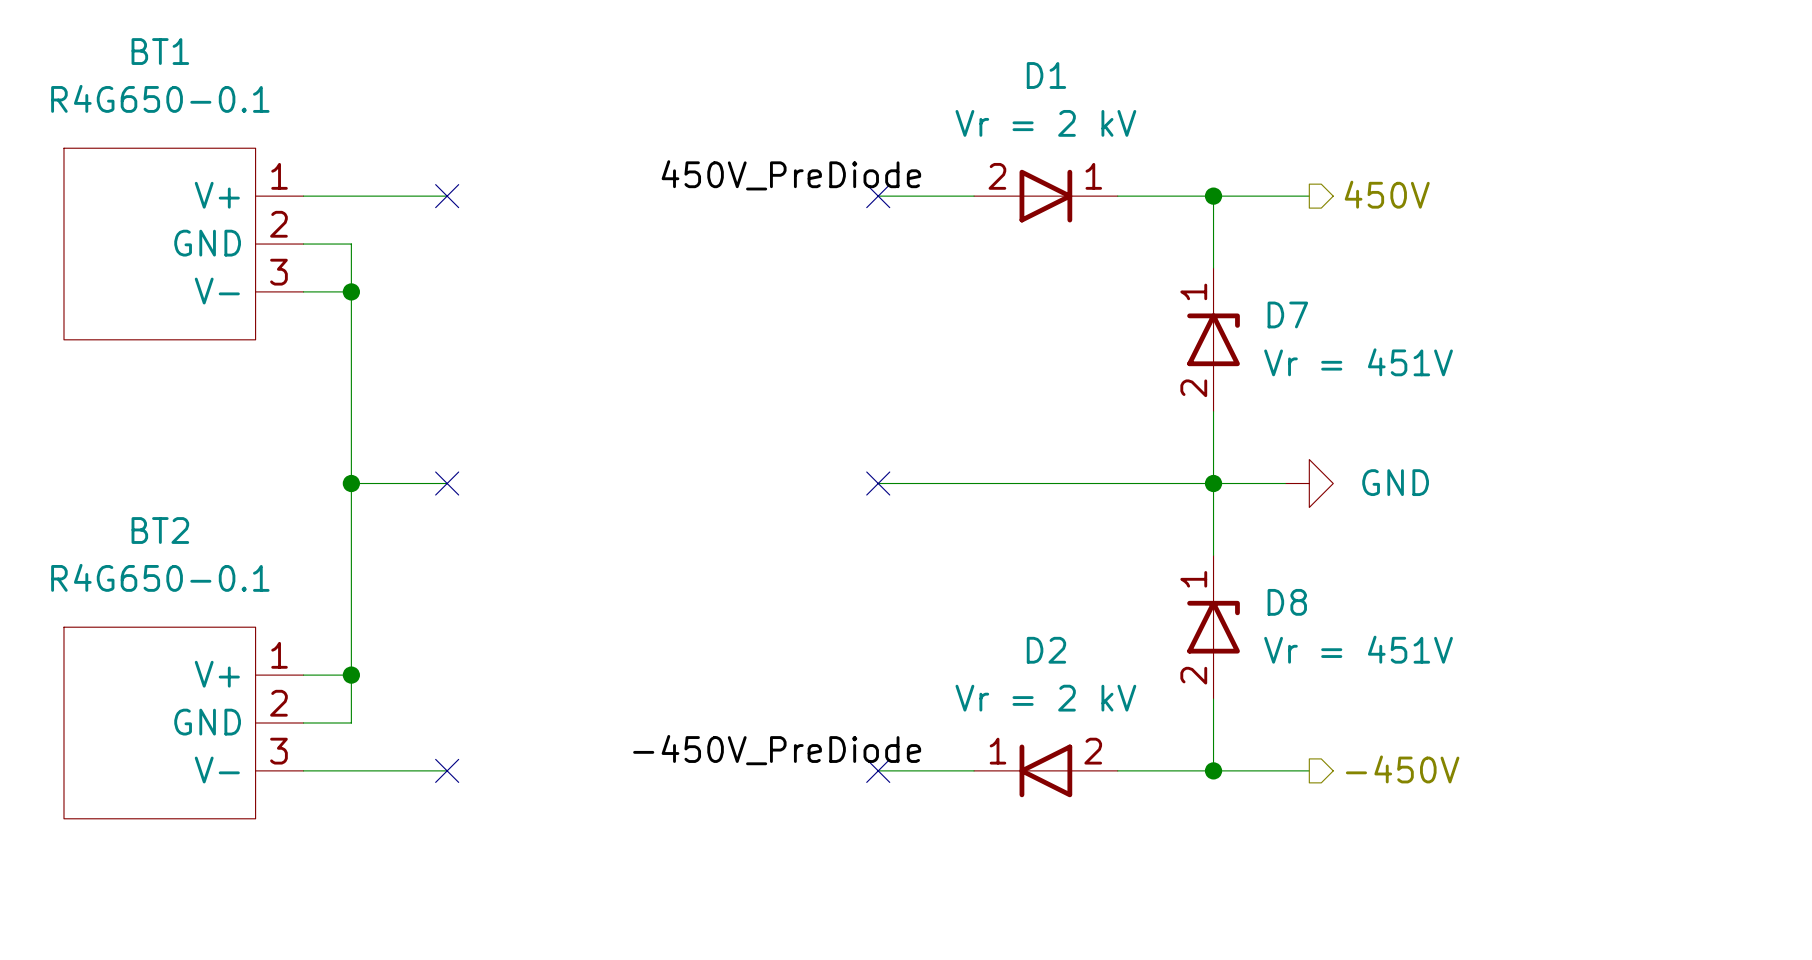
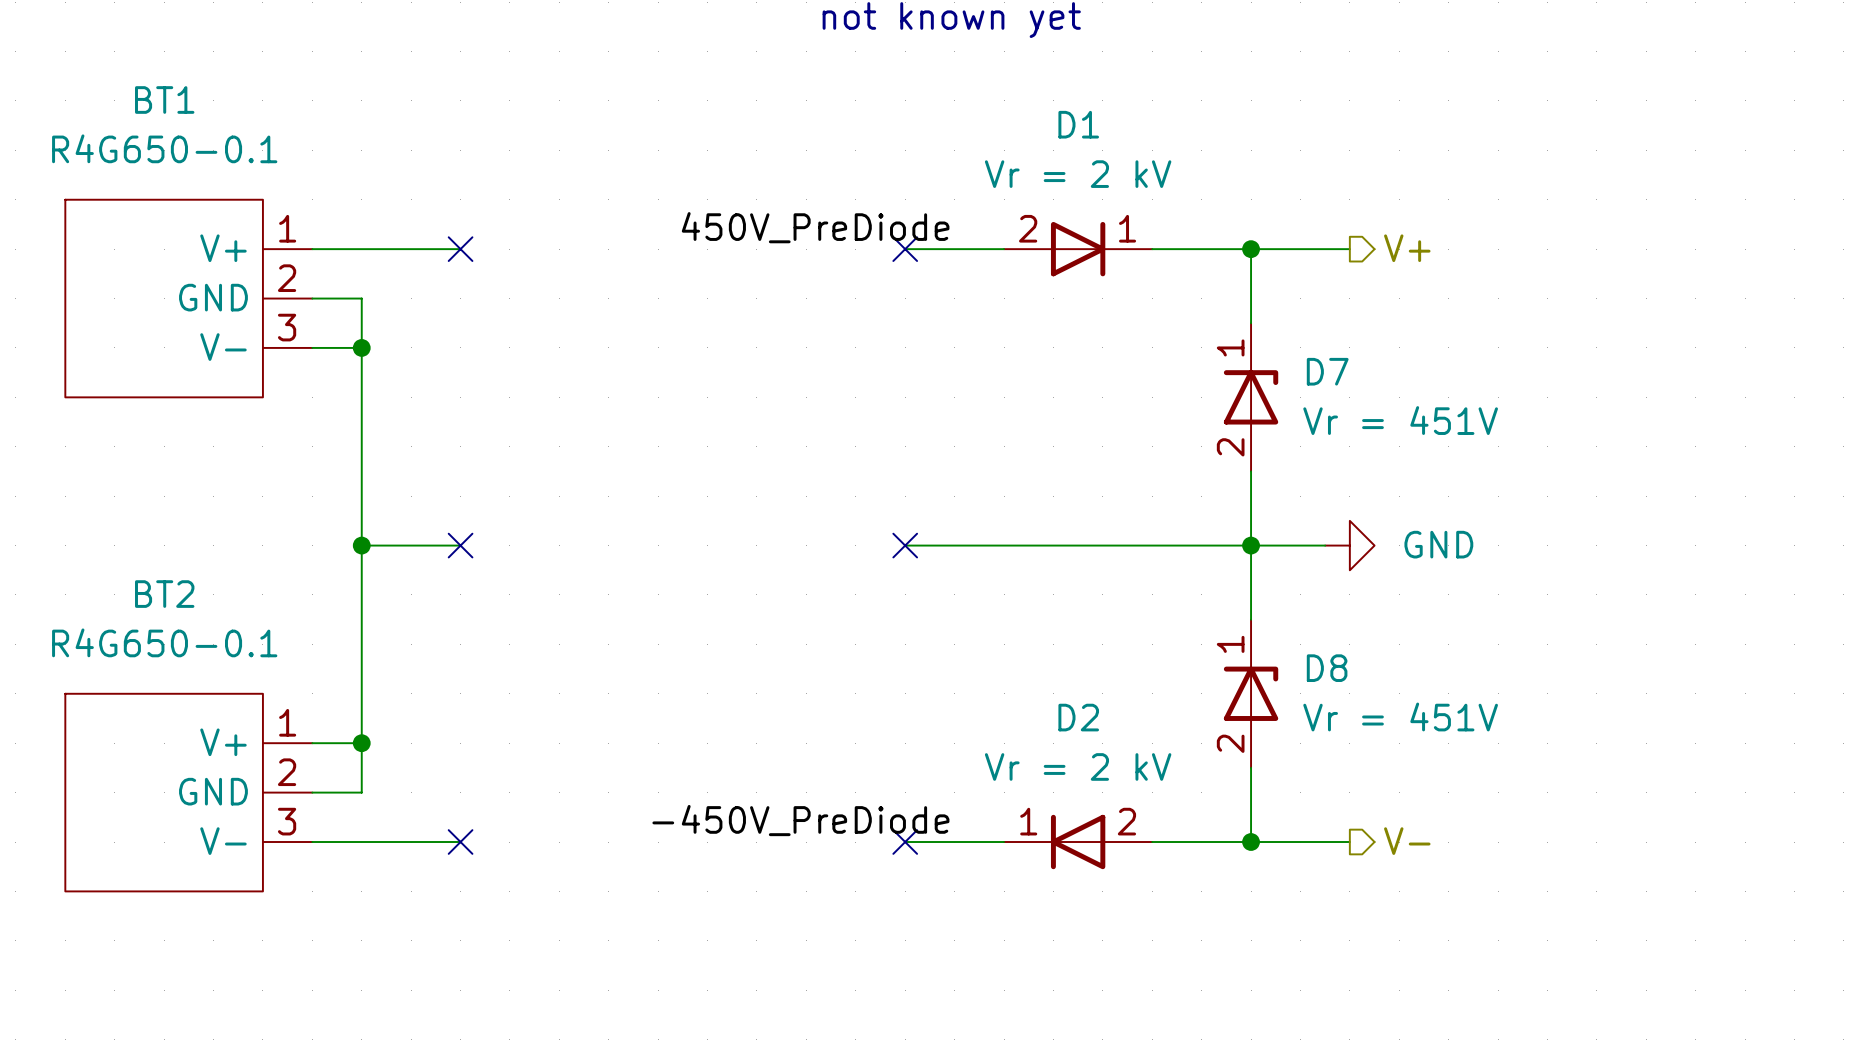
hierarchical label: 450V (1387, 194) -> V+ (1407, 248)
hierarchical label: -450V (1402, 769) -> V- (1407, 841)

